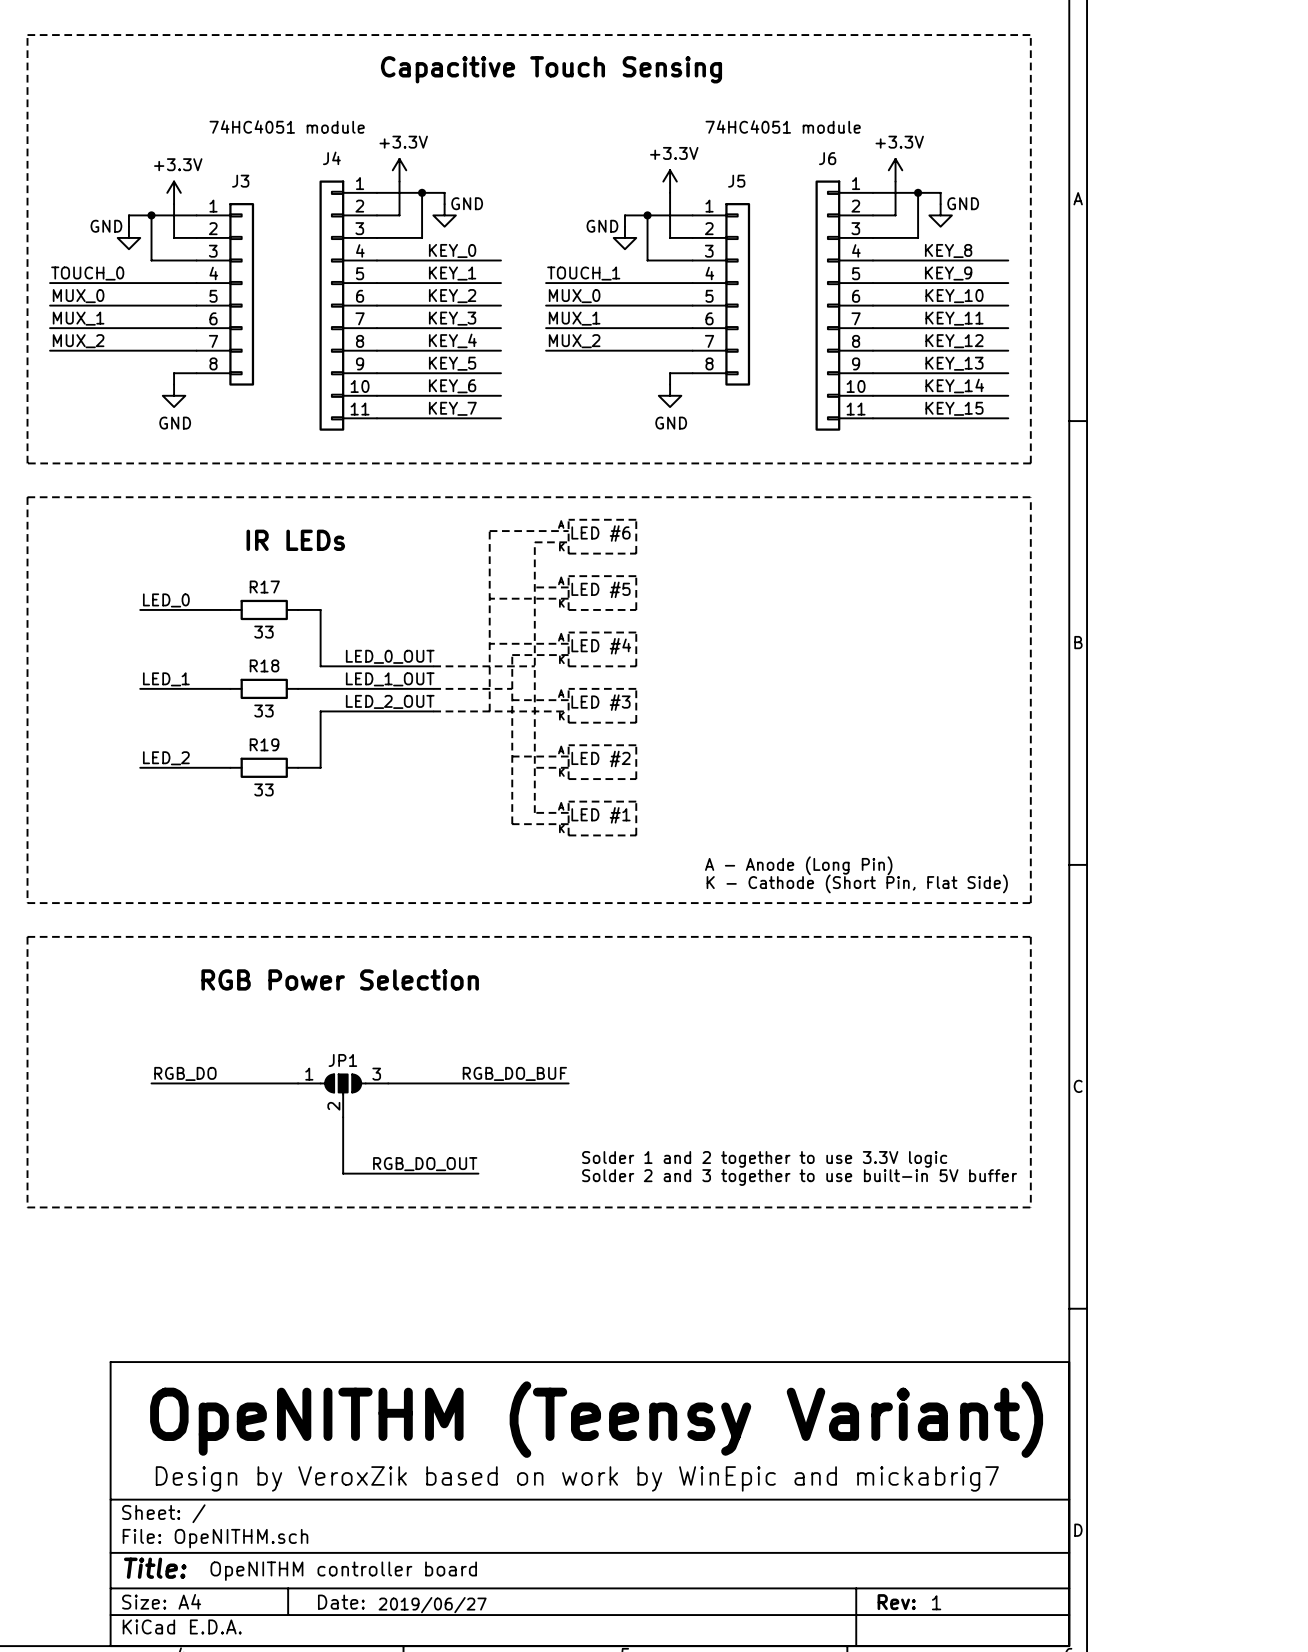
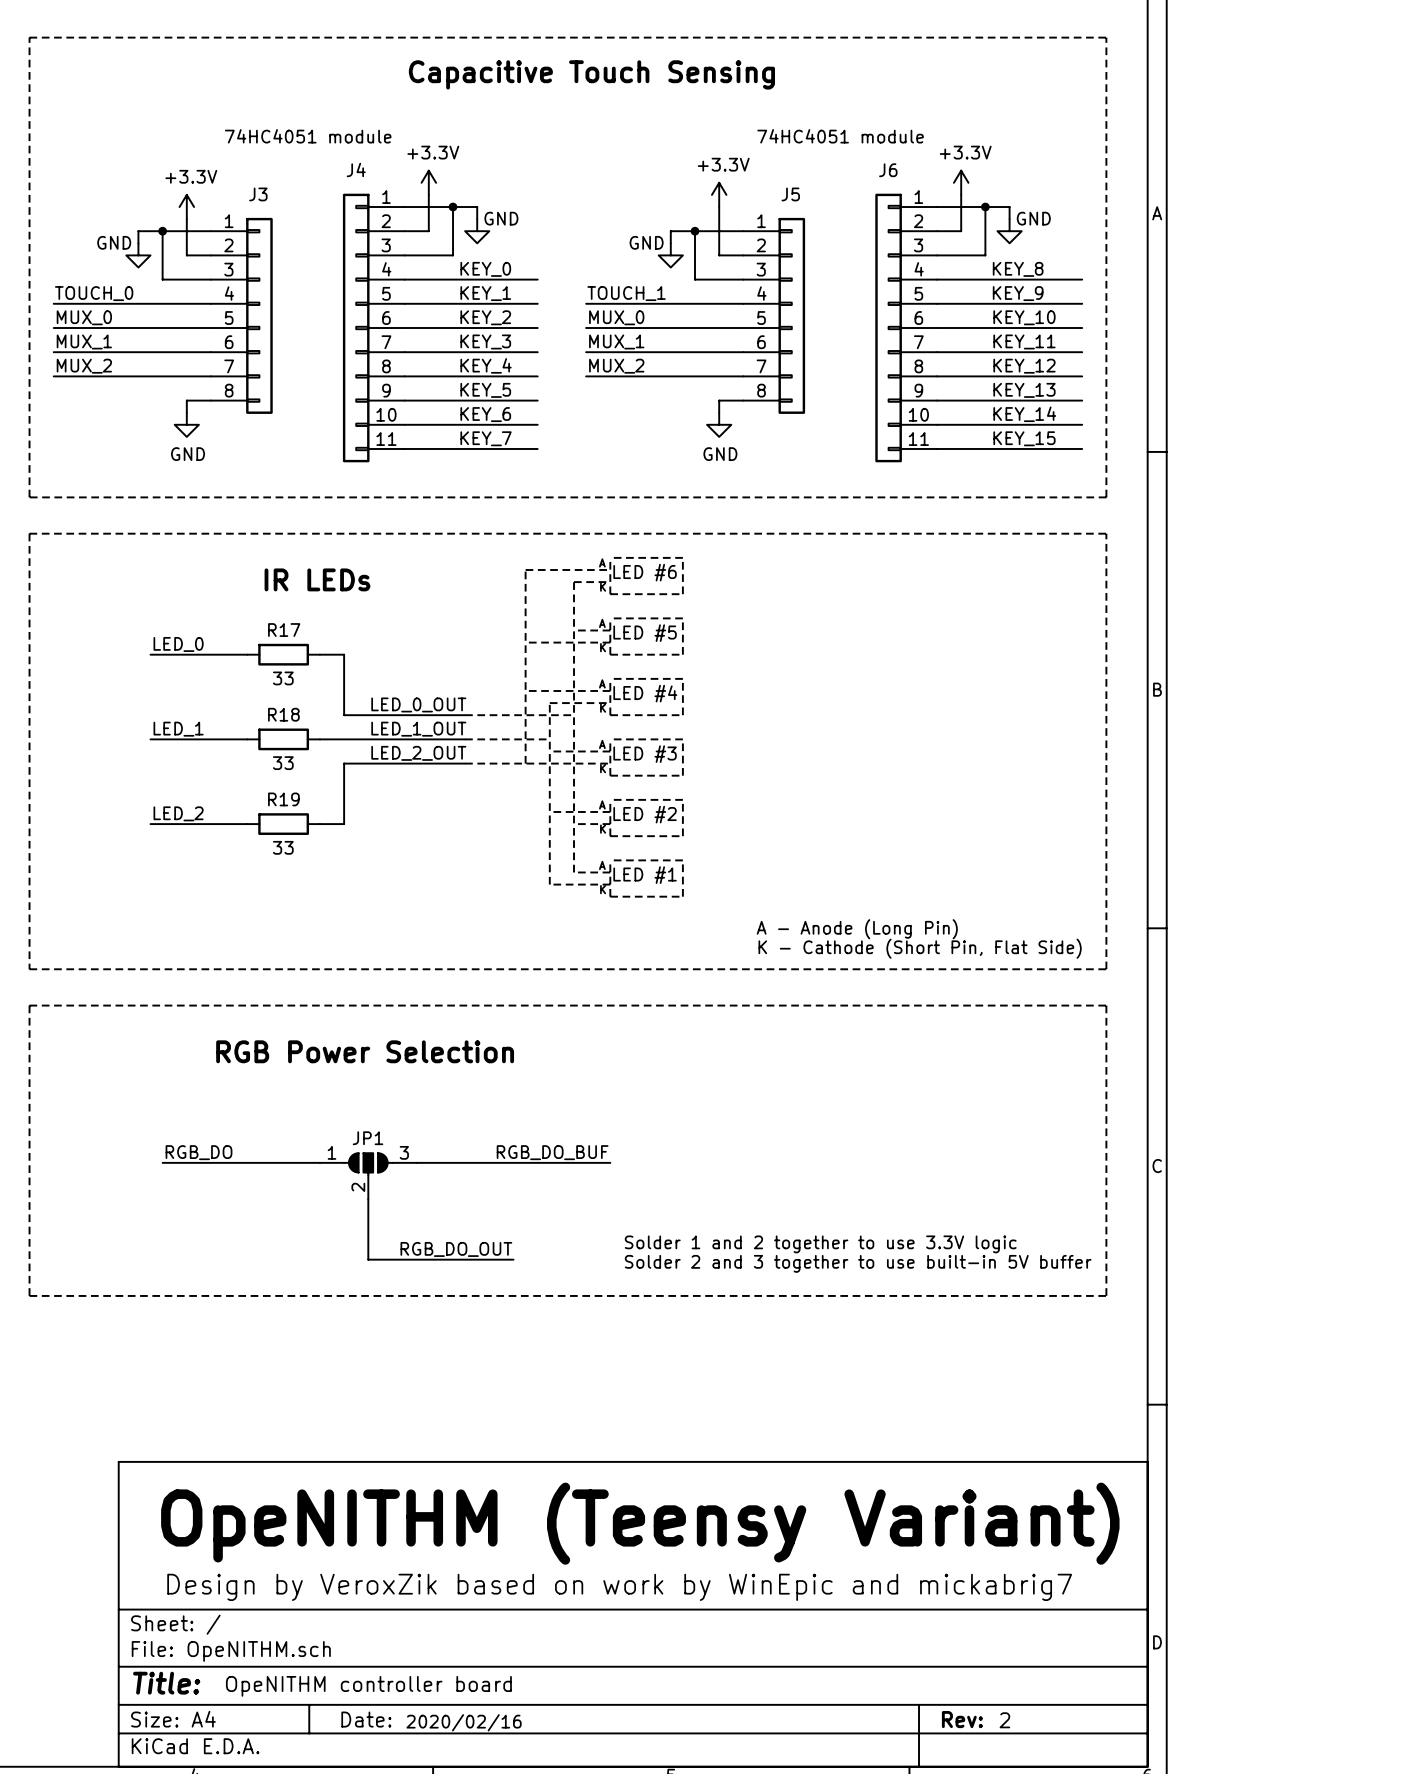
text: 1 (936, 1602) -> 2 (1004, 1720)
text: 2019/06/27 (432, 1605) -> 2020/02/16 (464, 1722)

